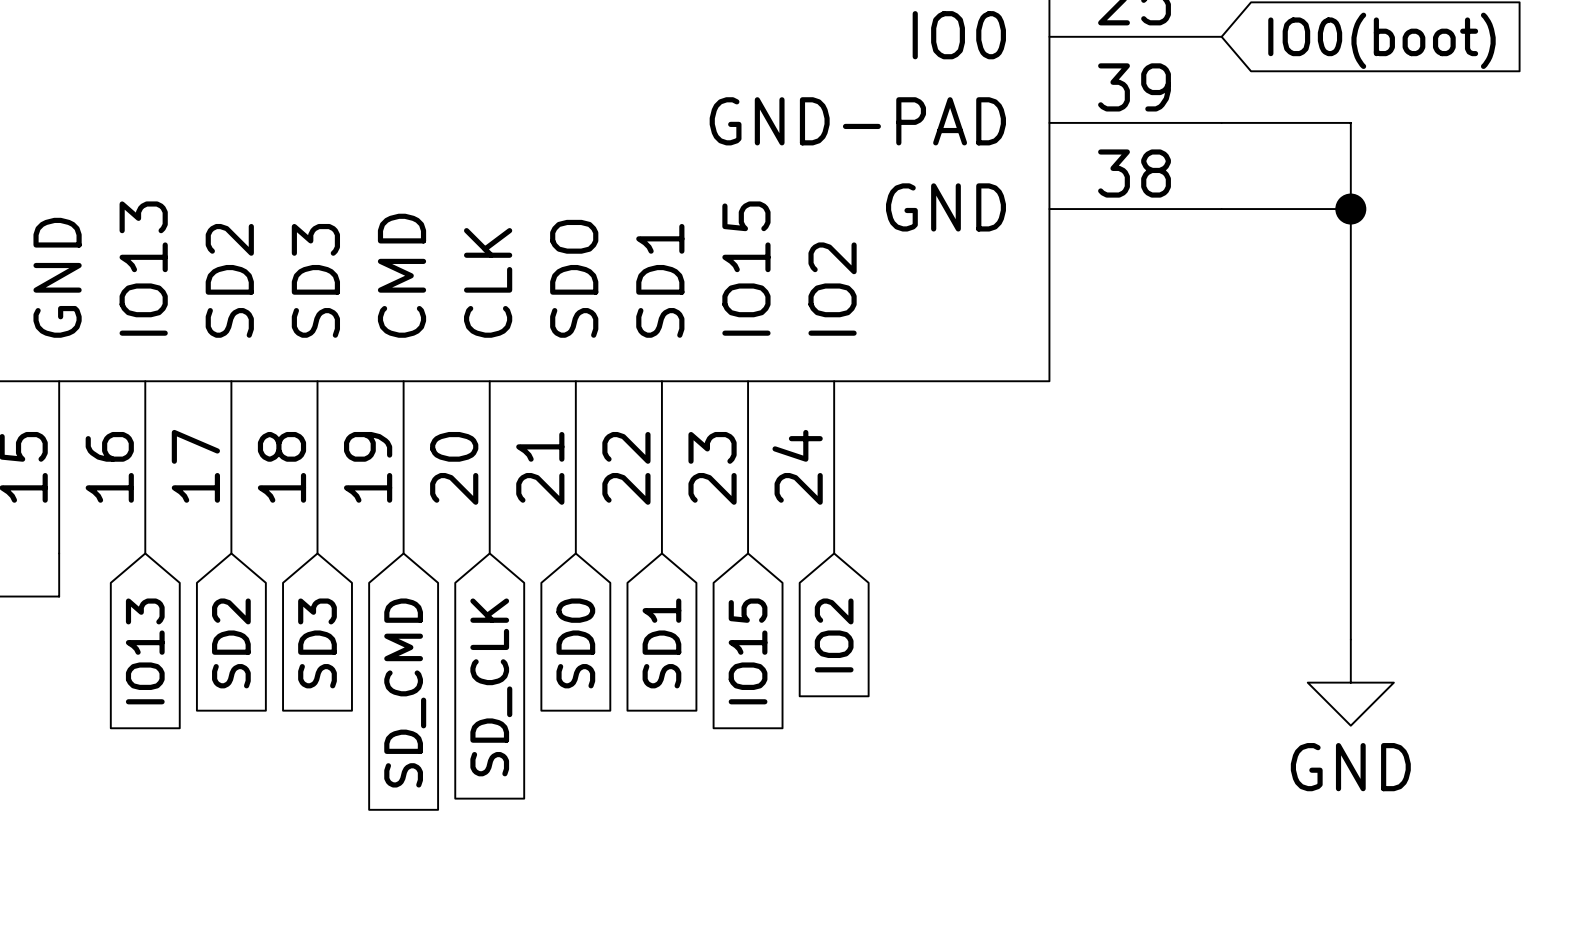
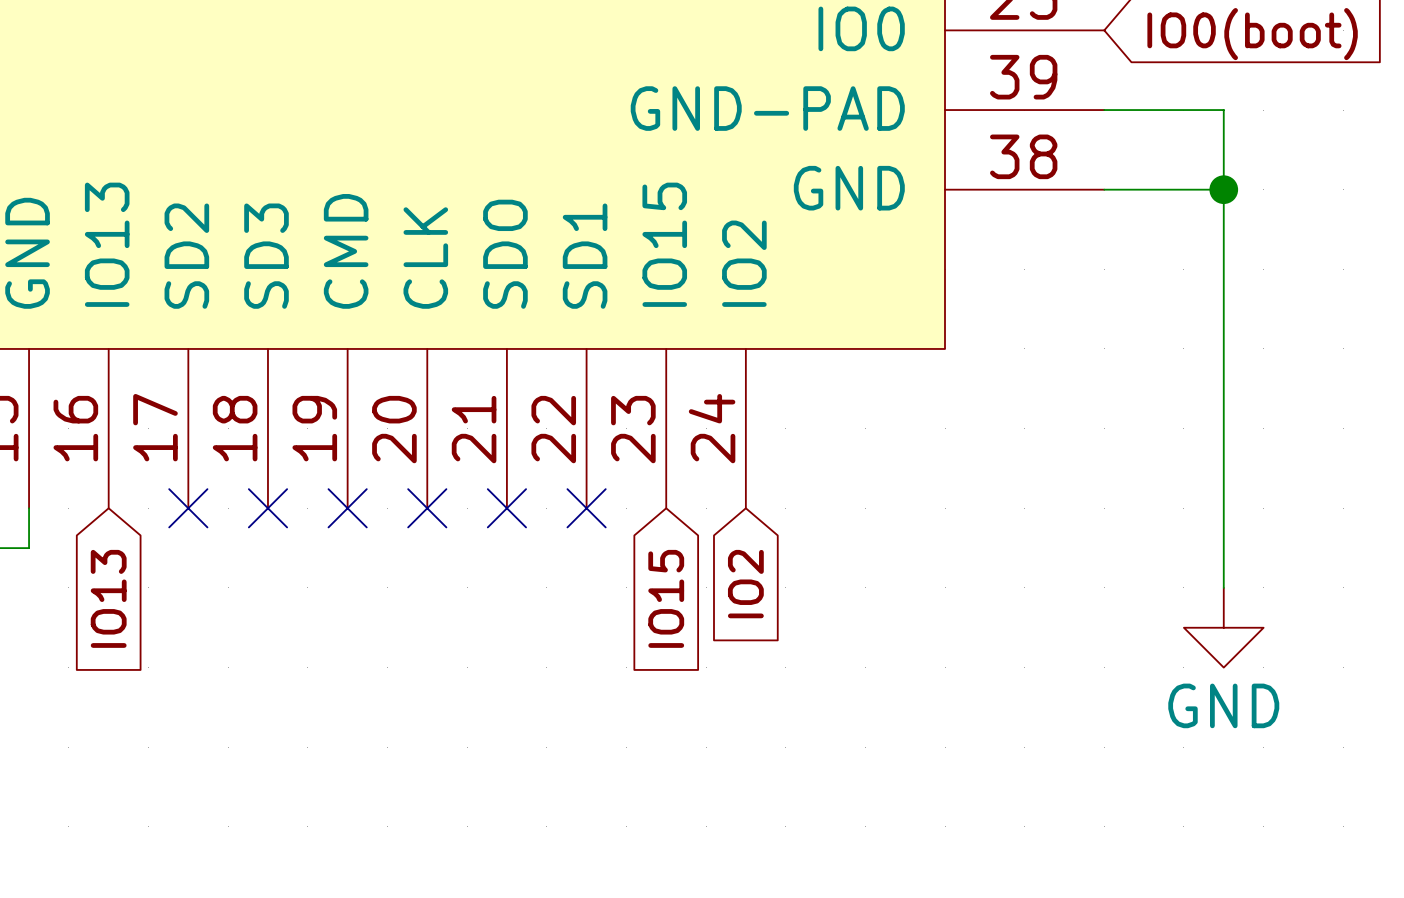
no-connect mark: none -> (188, 508)
no-connect mark: none -> (267, 508)
no-connect mark: none -> (347, 508)
no-connect mark: none -> (427, 508)
no-connect mark: none -> (506, 508)
no-connect mark: none -> (586, 508)
global label: SD2 (231, 643) -> none
global label: SD3 (317, 643) -> none
global label: SD0 (575, 643) -> none
global label: SD1 (661, 643) -> none
global label: SD_CLK (491, 687) -> none
global label: SD_CMD (405, 693) -> none

